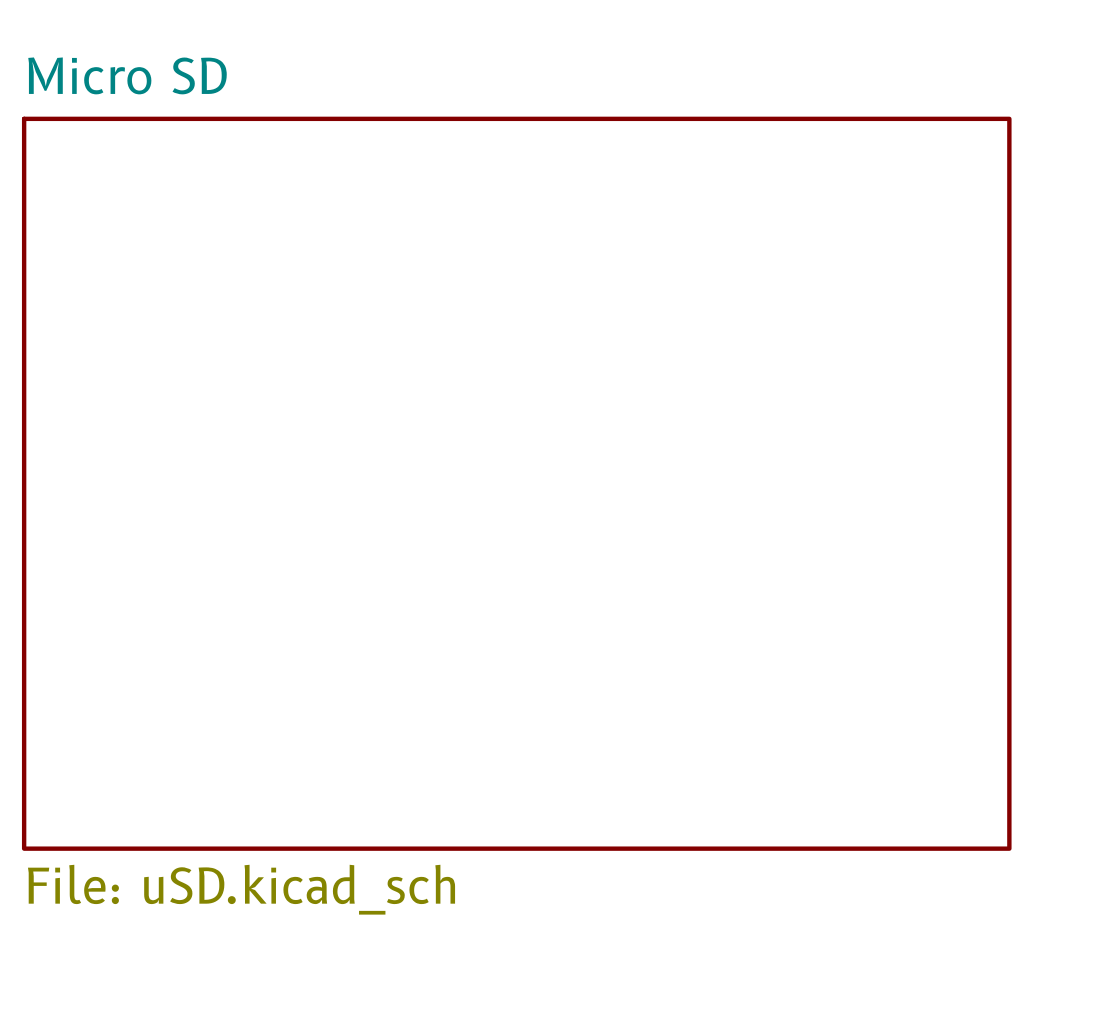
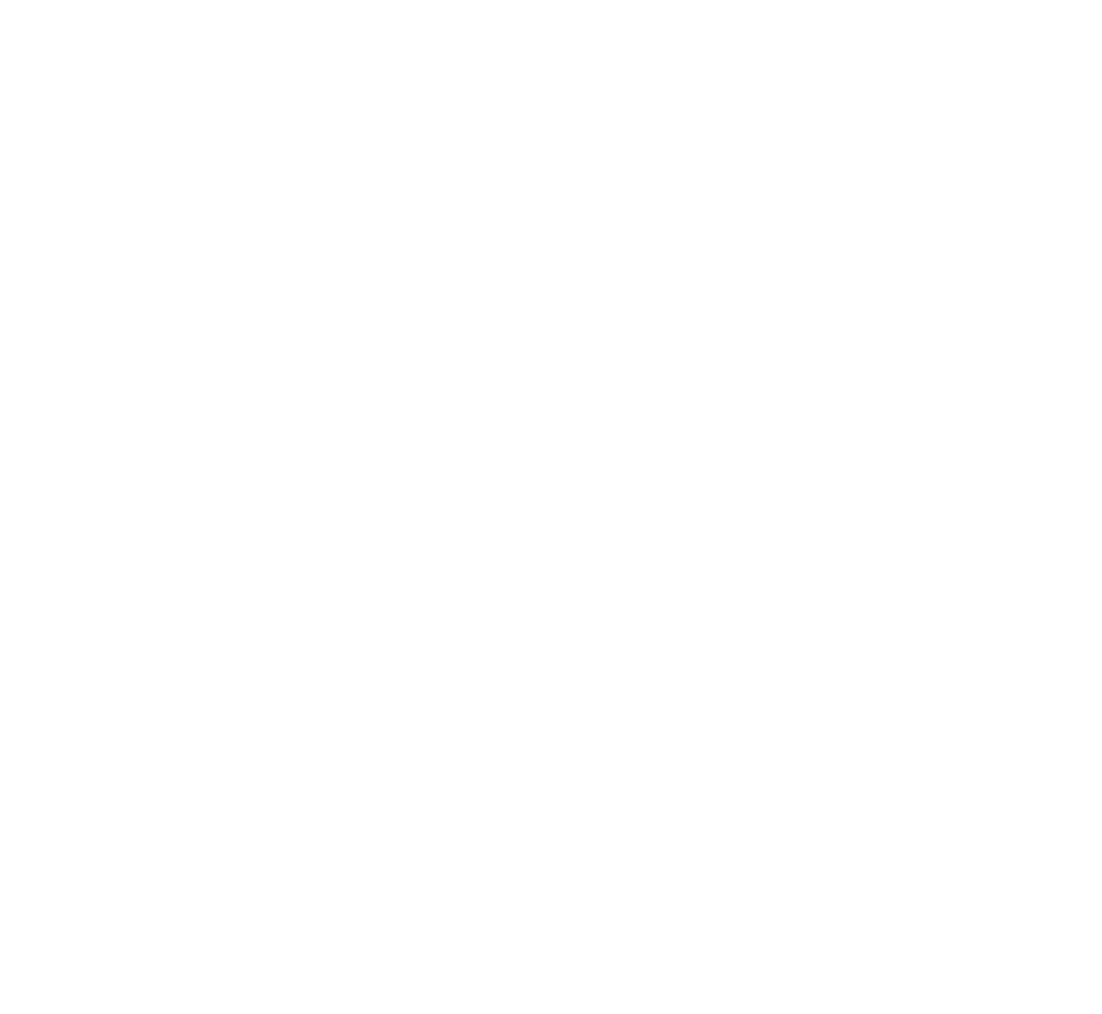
sheet Micro SD: File: uSD.kicad_sch (516, 483) -> none

